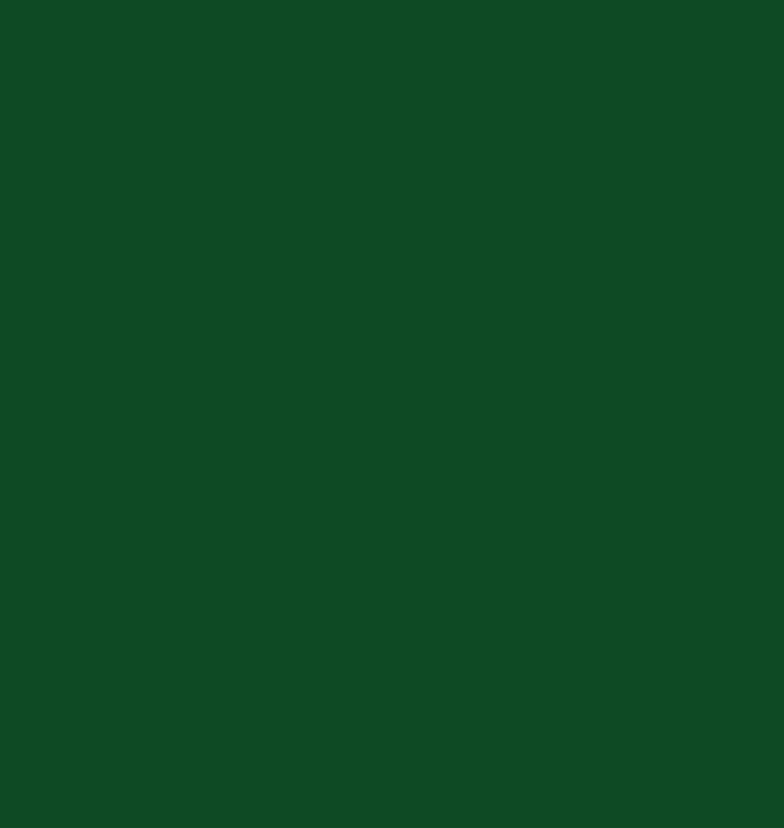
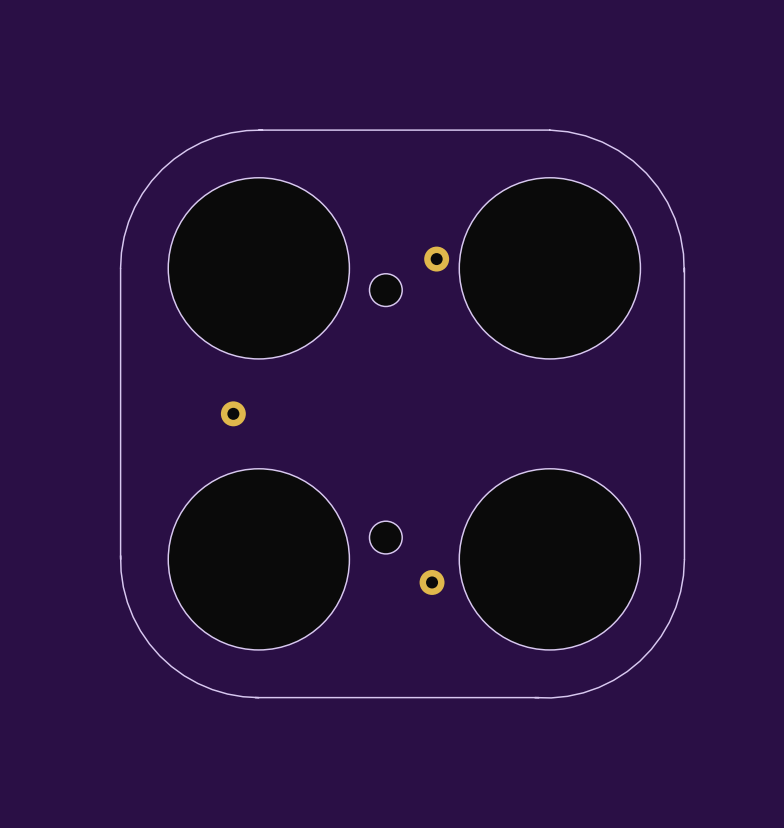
part: none -> (402, 414)

